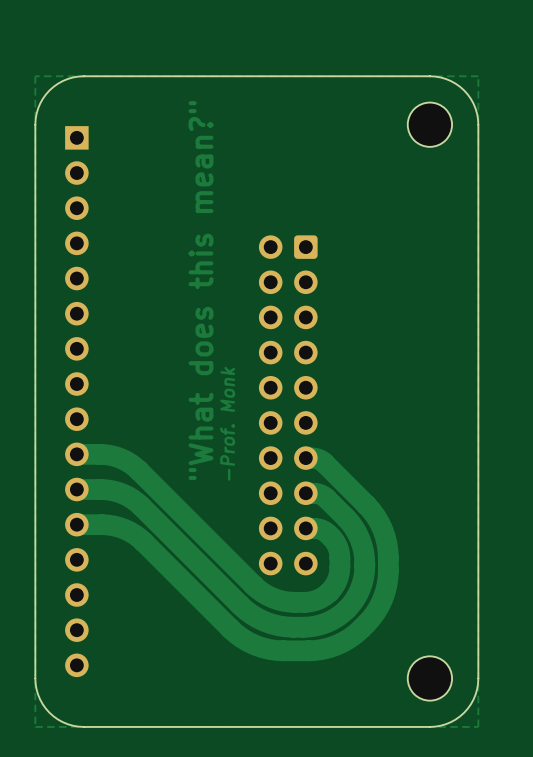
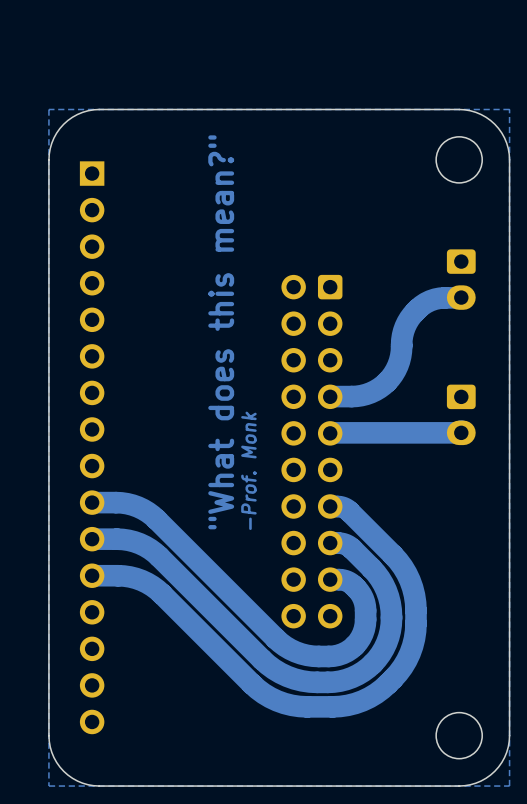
part: none -> (461, 279)
track: none -> (461, 297) (440, 298) (430, 300) (412, 314) (403, 331) (397, 365) (383, 385) (361, 395) (330, 396)
part: none -> (461, 414)
track: none -> (461, 431) (458, 432) (330, 433)

